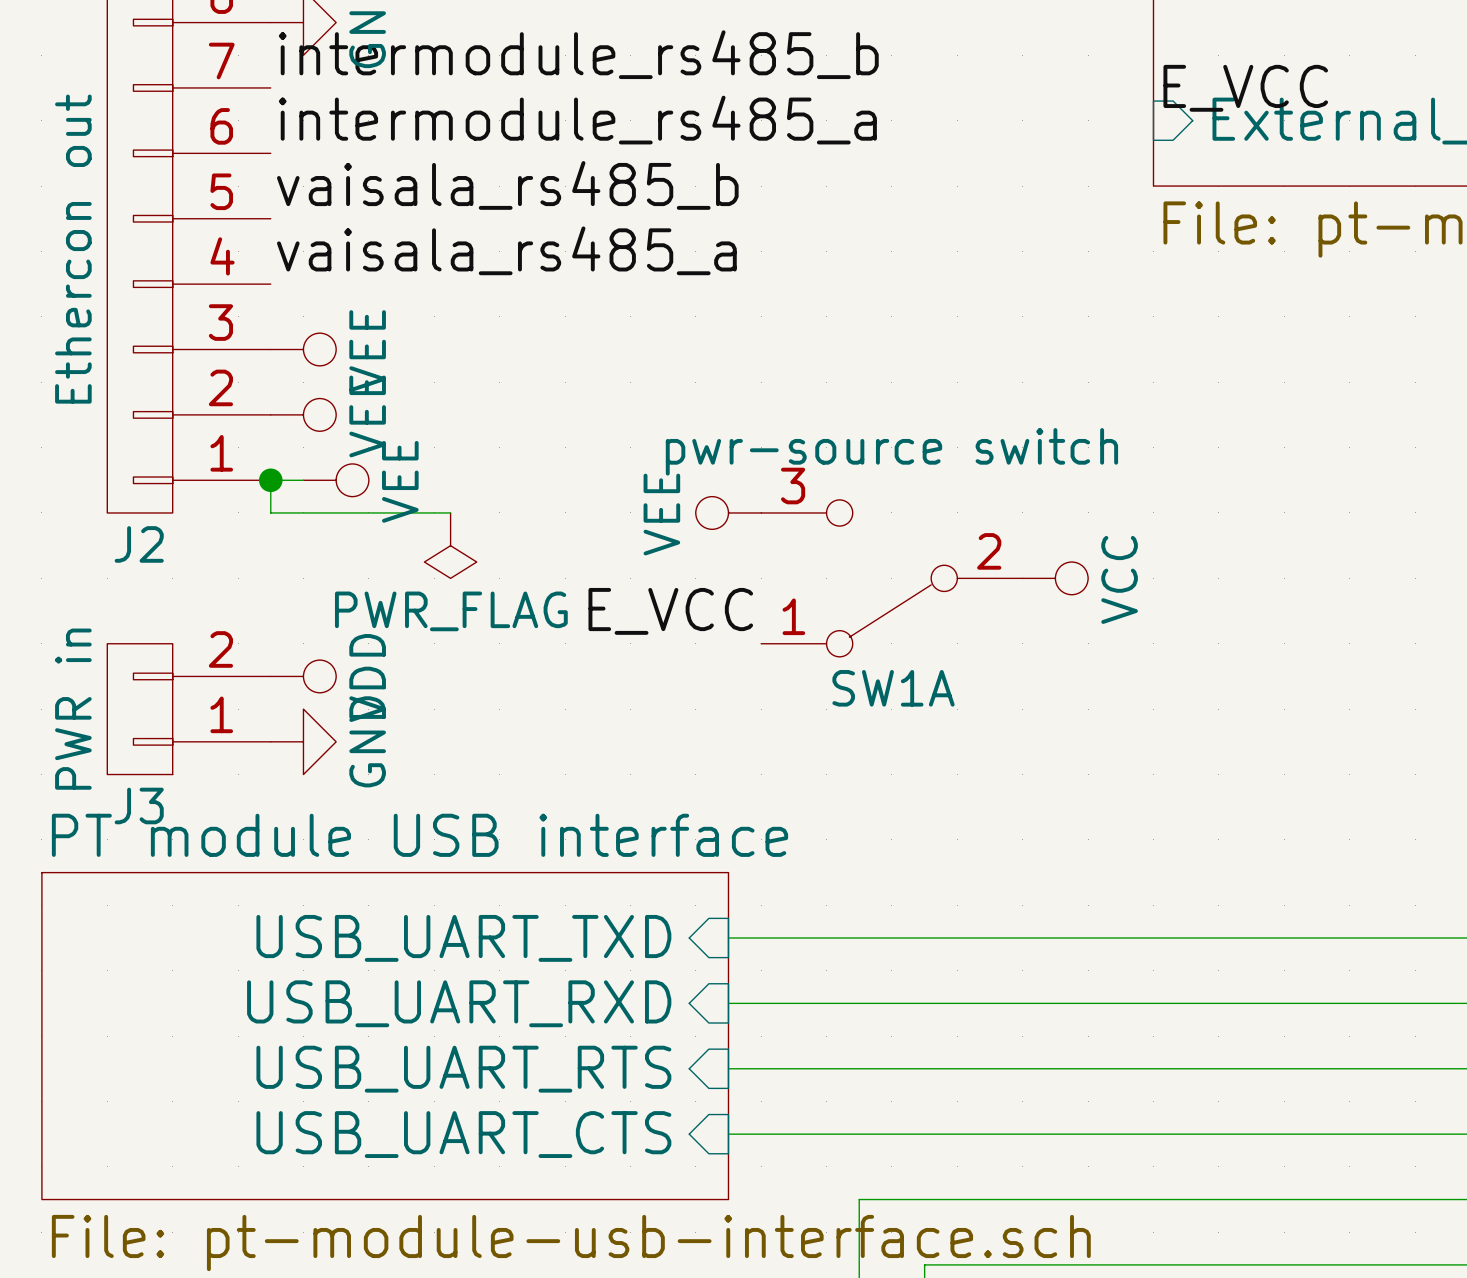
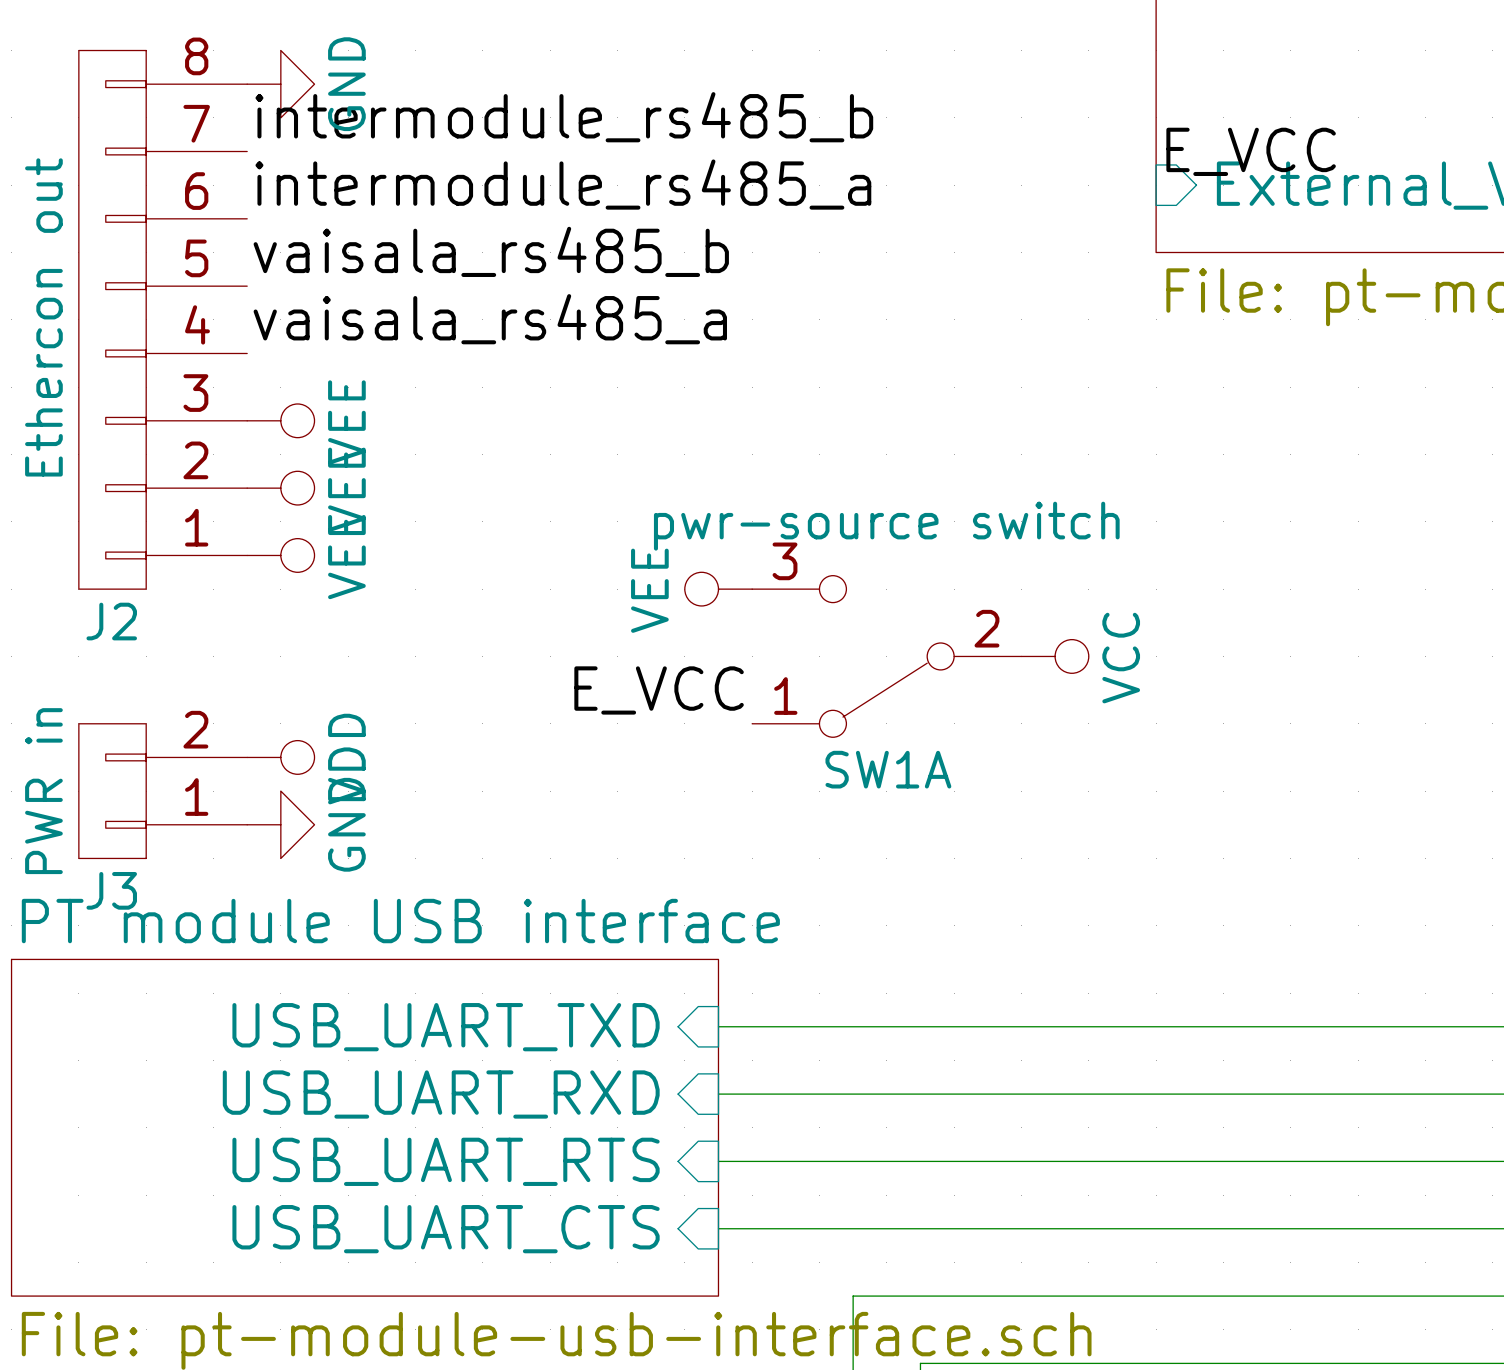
junction: (270, 480) -> none
wire: (303, 480) (270, 480) (270, 512) (450, 512) -> none
power symbol position: VEE (336, 480) -> VEE (280, 555)
power symbol: PWR_FLAG (450, 545) -> none

